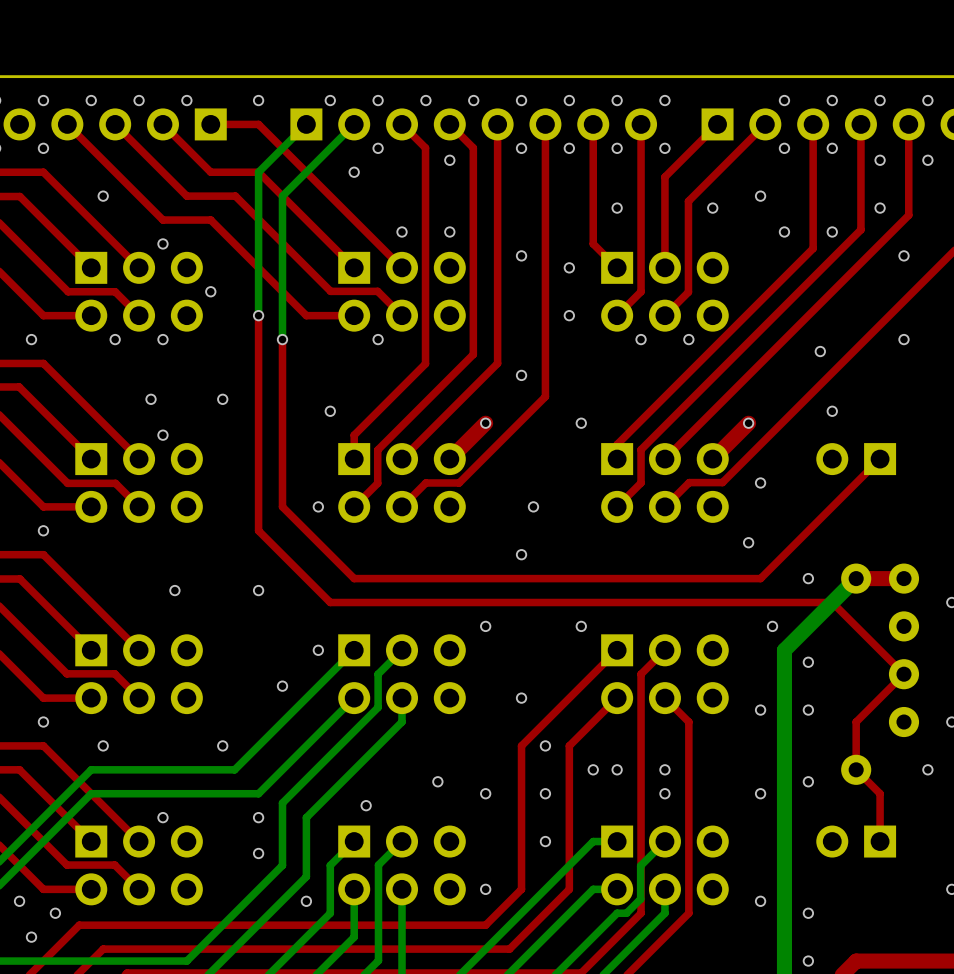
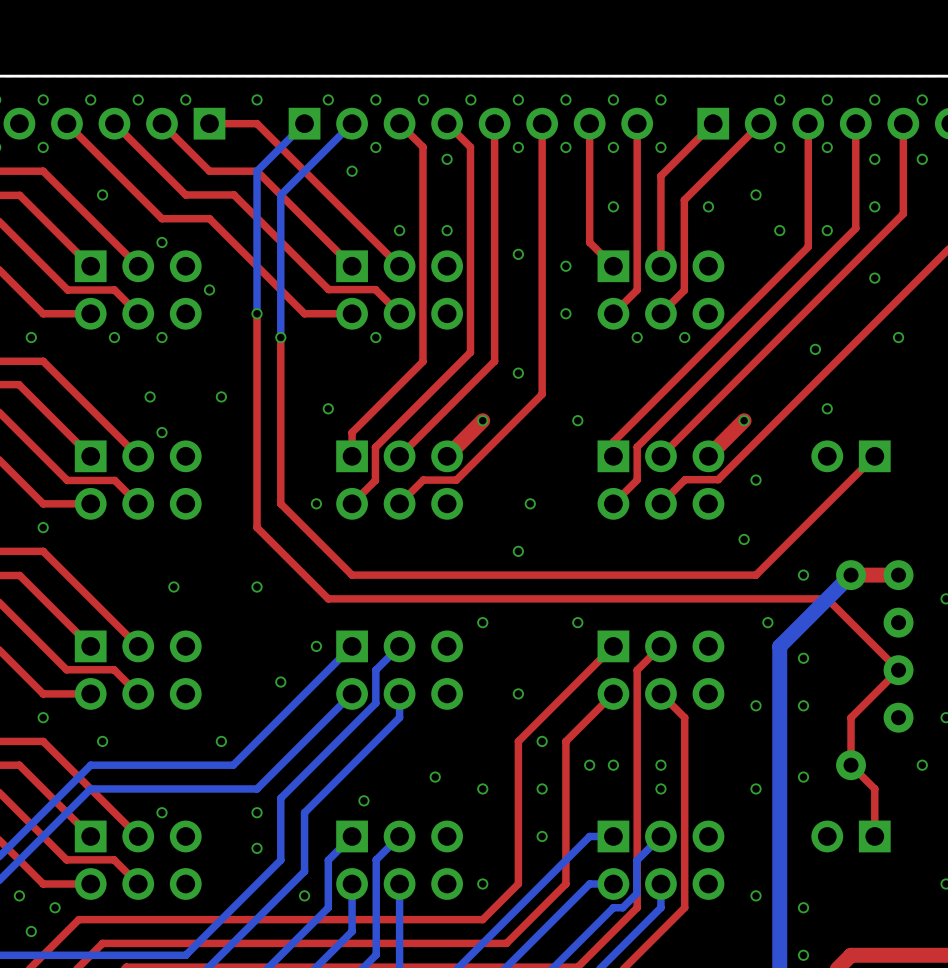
via position: (903, 255) -> (874, 278)

